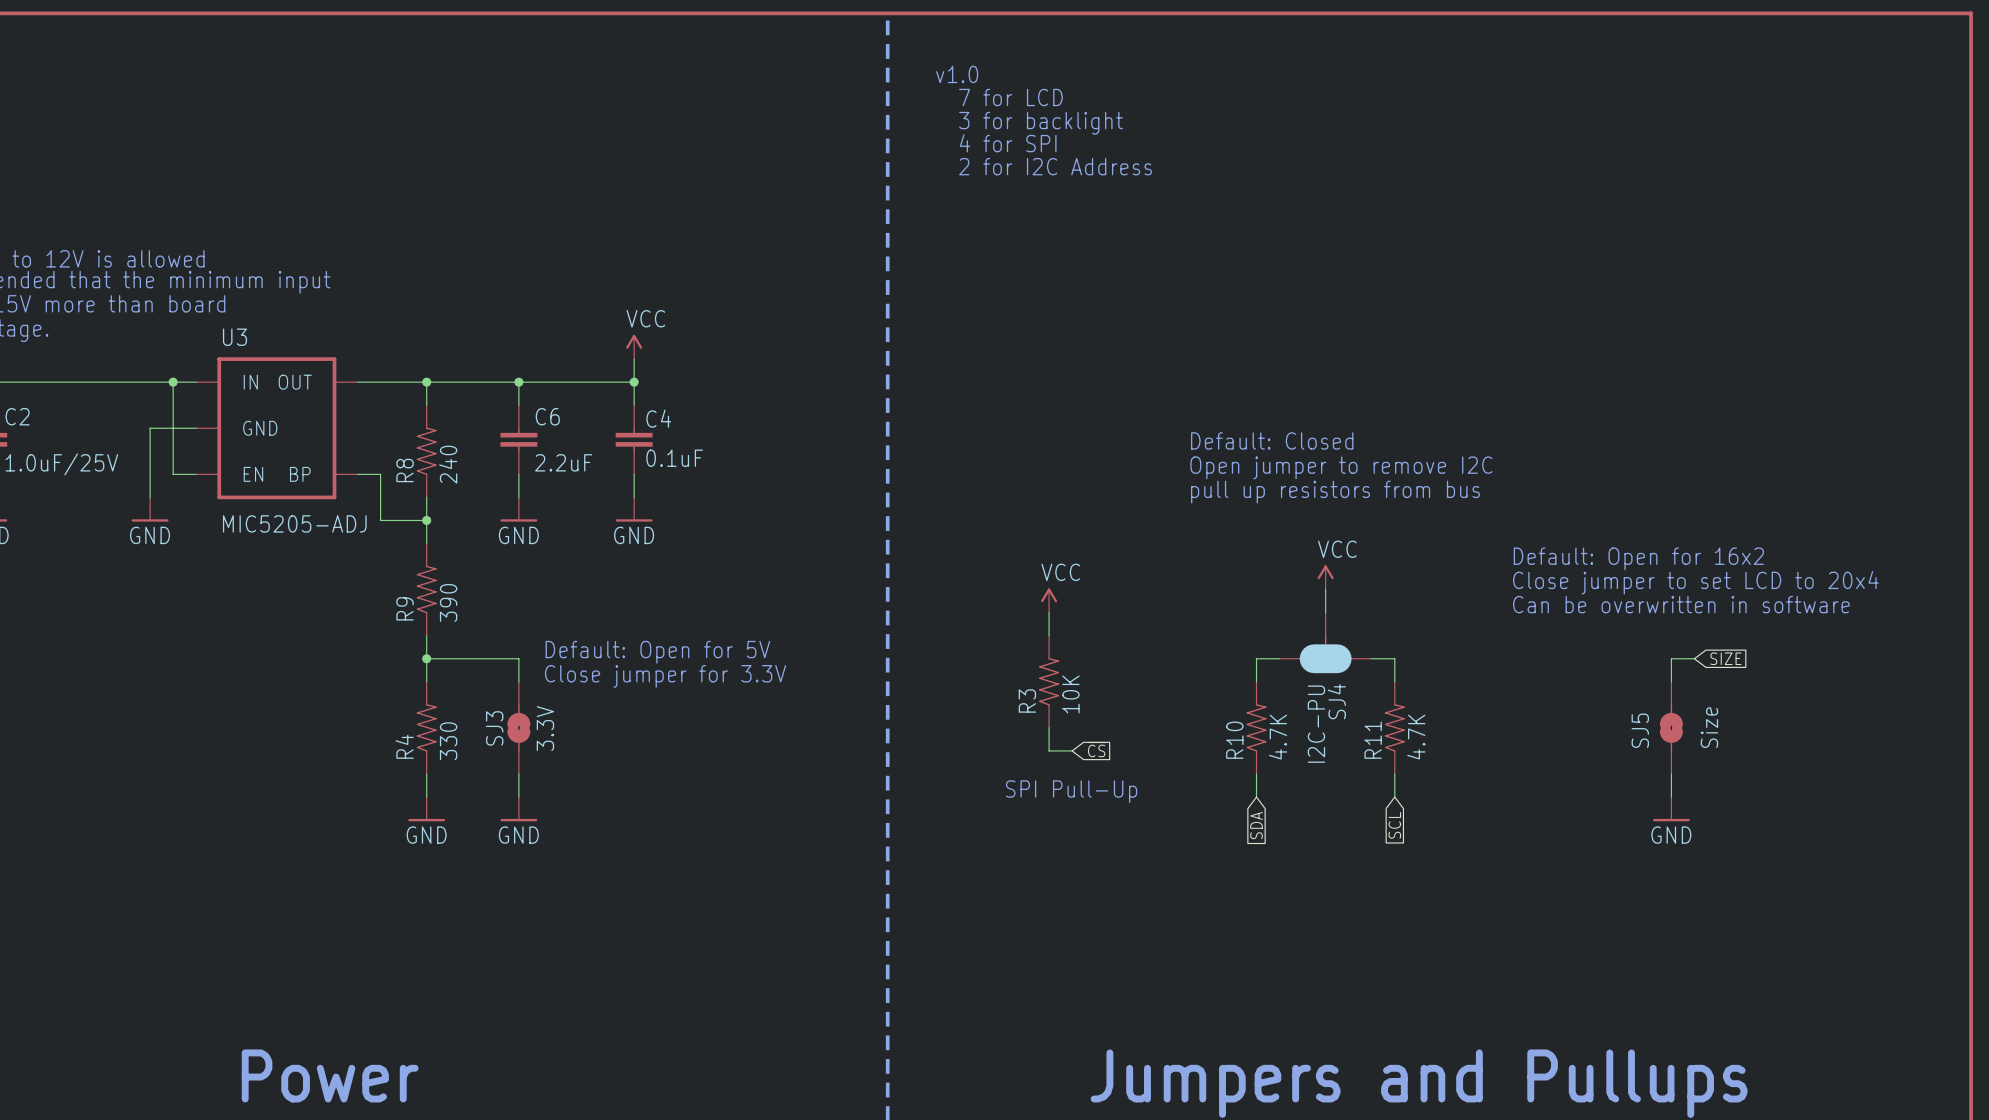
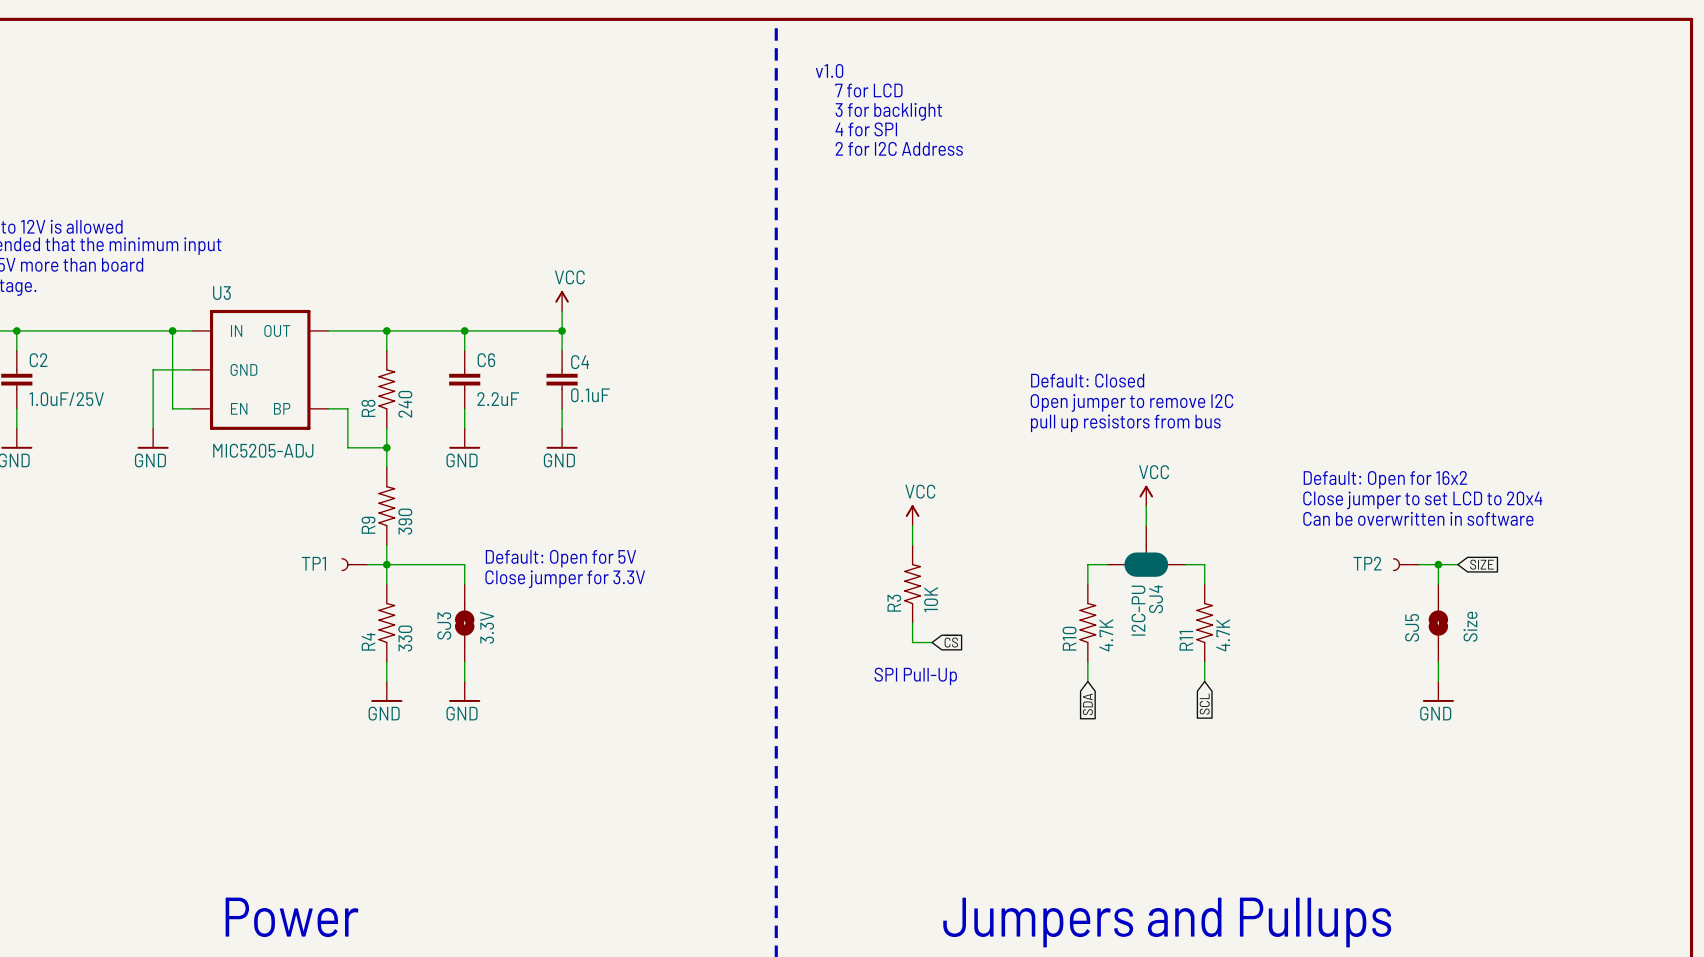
TP1: none -> (354, 564)
wire: none -> (367, 564) (386, 564)
TP2: none -> (1406, 564)
wire: none -> (1418, 564) (1438, 564)
junction: none -> (1438, 564)

